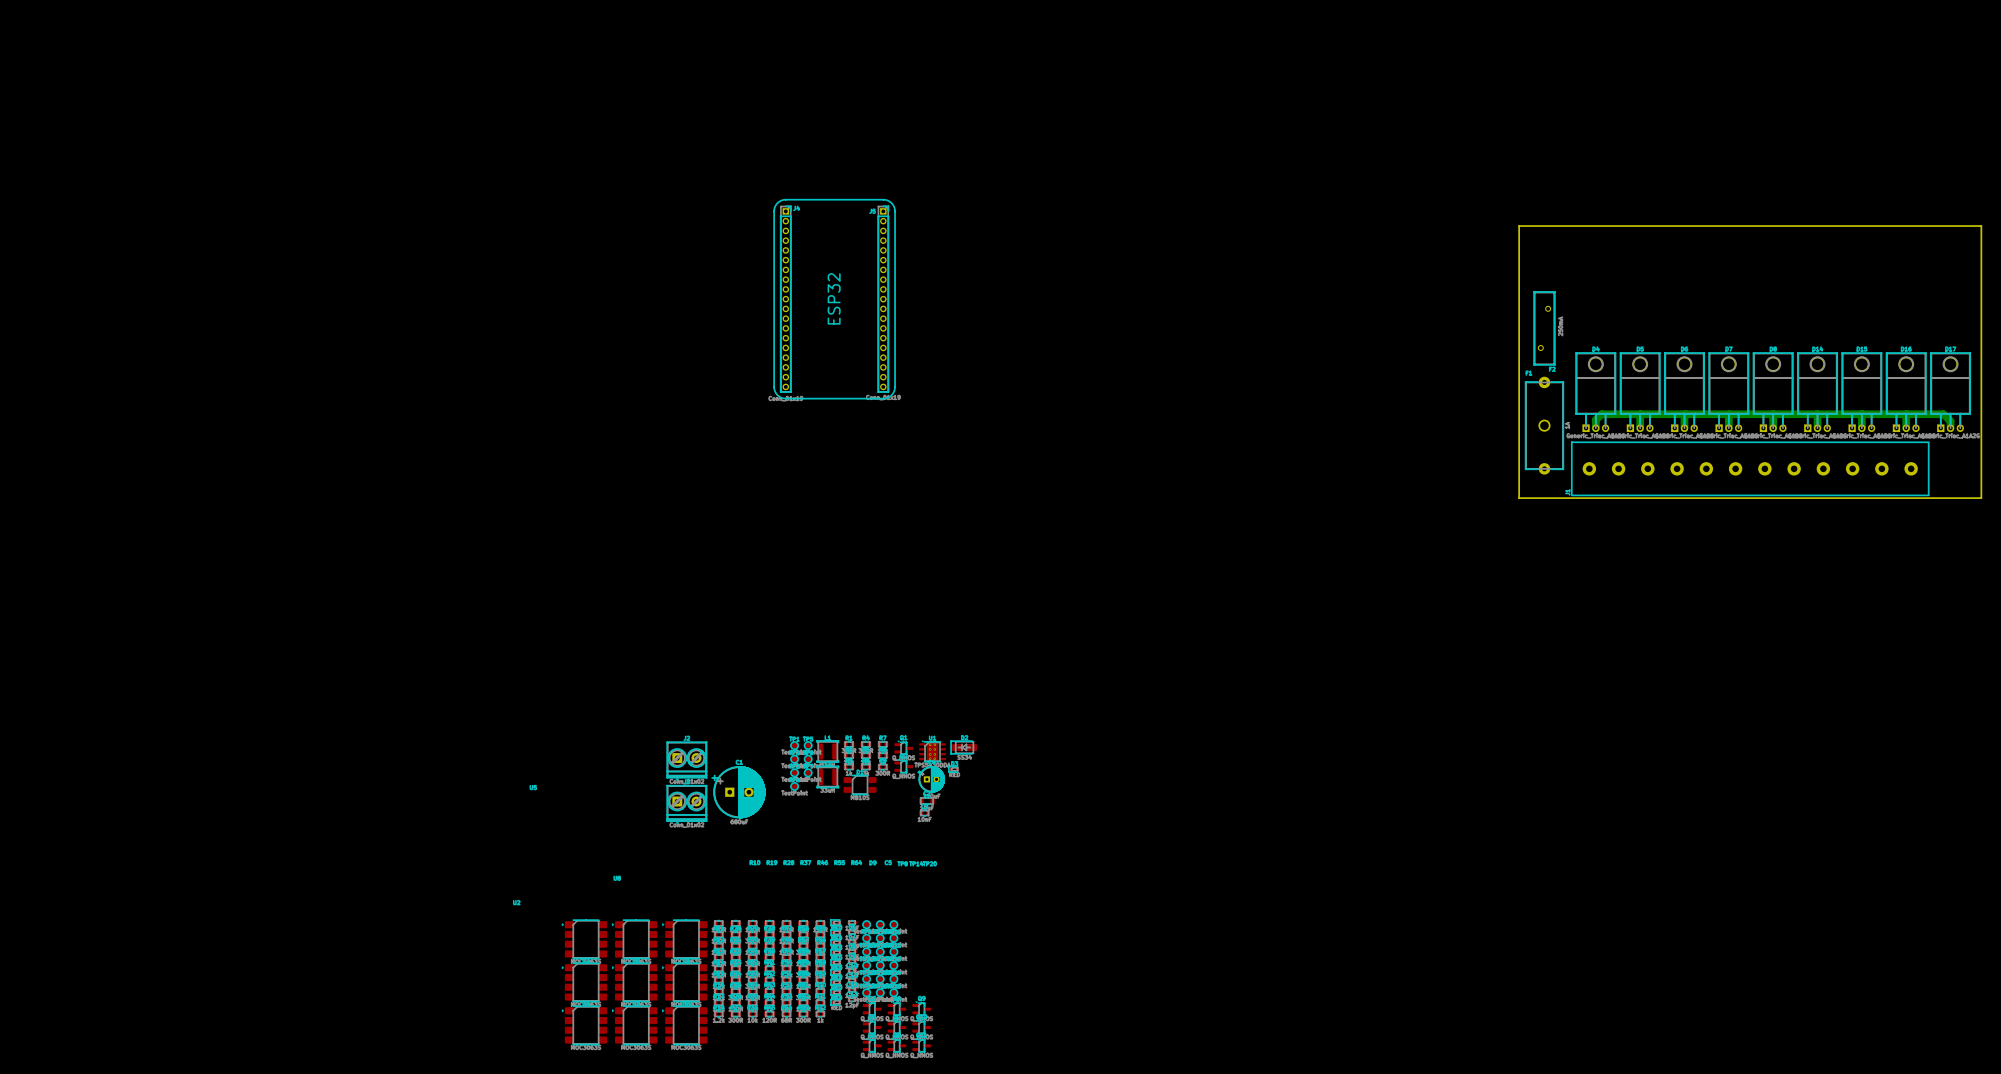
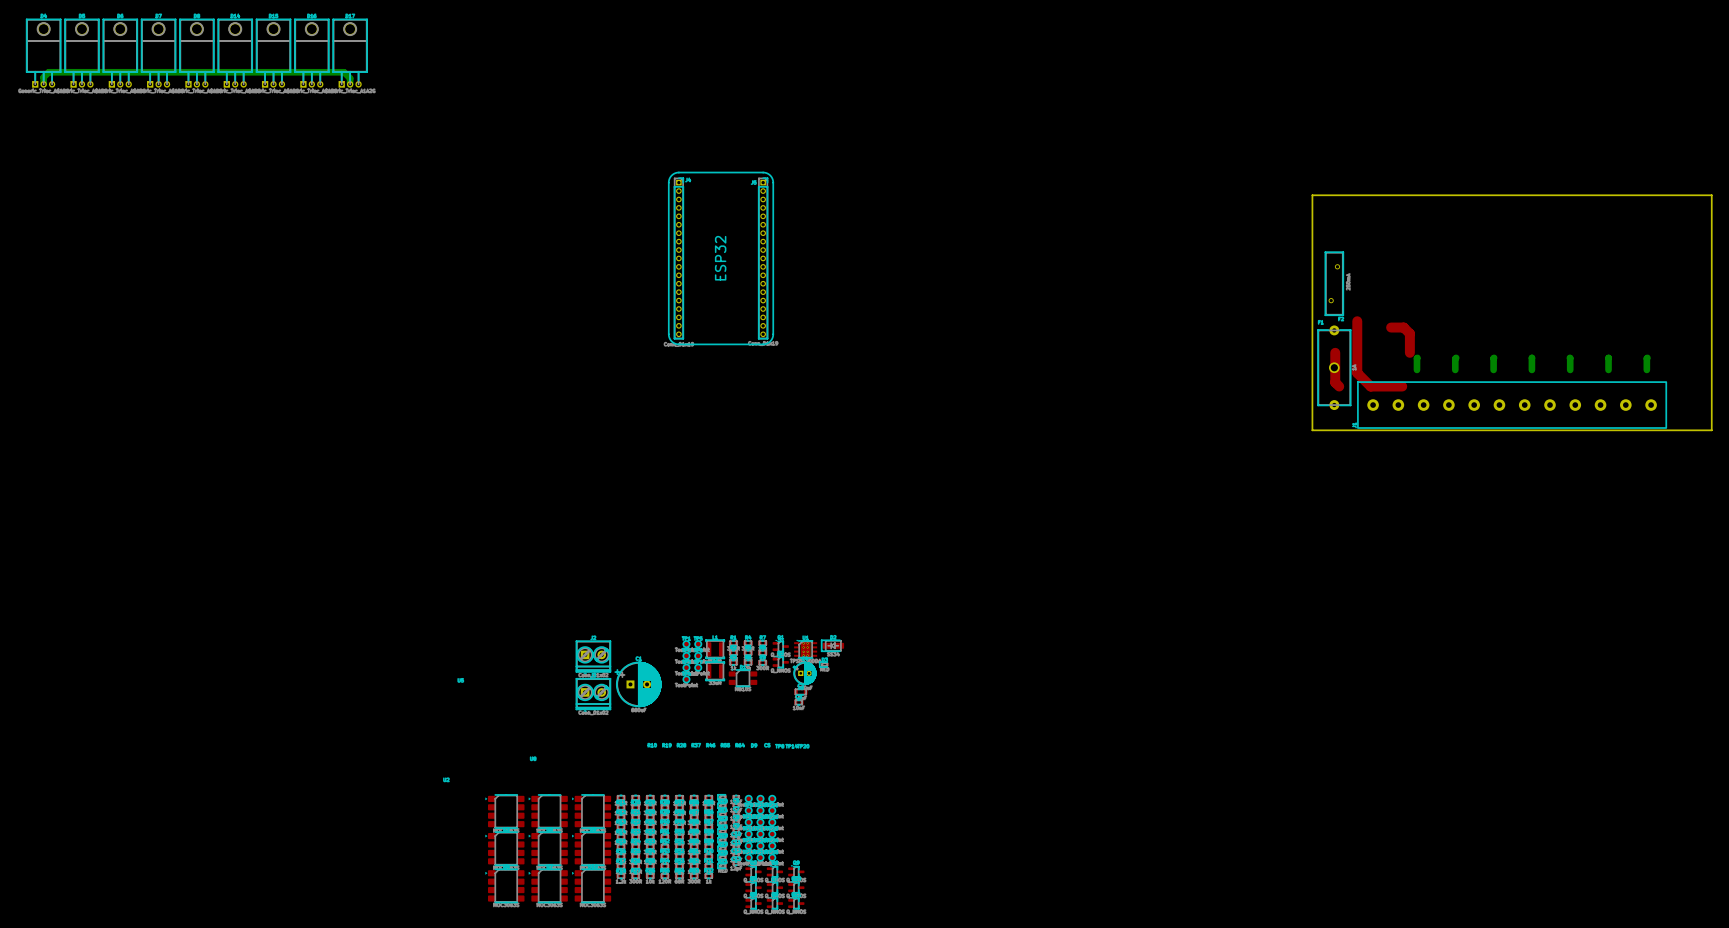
bottom track: none -> (43, 84) (43, 77) (48, 72) (344, 72) (350, 78) (350, 84)
top track: none -> (1357, 321) (1357, 373) (1370, 386) (1402, 386)
top track: none -> (1391, 327) (1403, 327) (1409, 333) (1409, 352)
part position: (1595, 392) -> (43, 53)
part position: (1640, 392) -> (81, 53)
part position: (1684, 392) -> (120, 53)
part position: (1728, 392) -> (158, 53)
part position: (1773, 392) -> (196, 53)
part position: (1817, 392) -> (235, 53)
part position: (1861, 392) -> (273, 53)
part position: (1906, 392) -> (311, 53)
part position: (1950, 392) -> (350, 53)
top track: none -> (1335, 352) (1335, 382) (1339, 386)
bottom track: (1595, 428) (1595, 420) (1601, 414) (1943, 414) (1950, 421) (1950, 428) -> none

